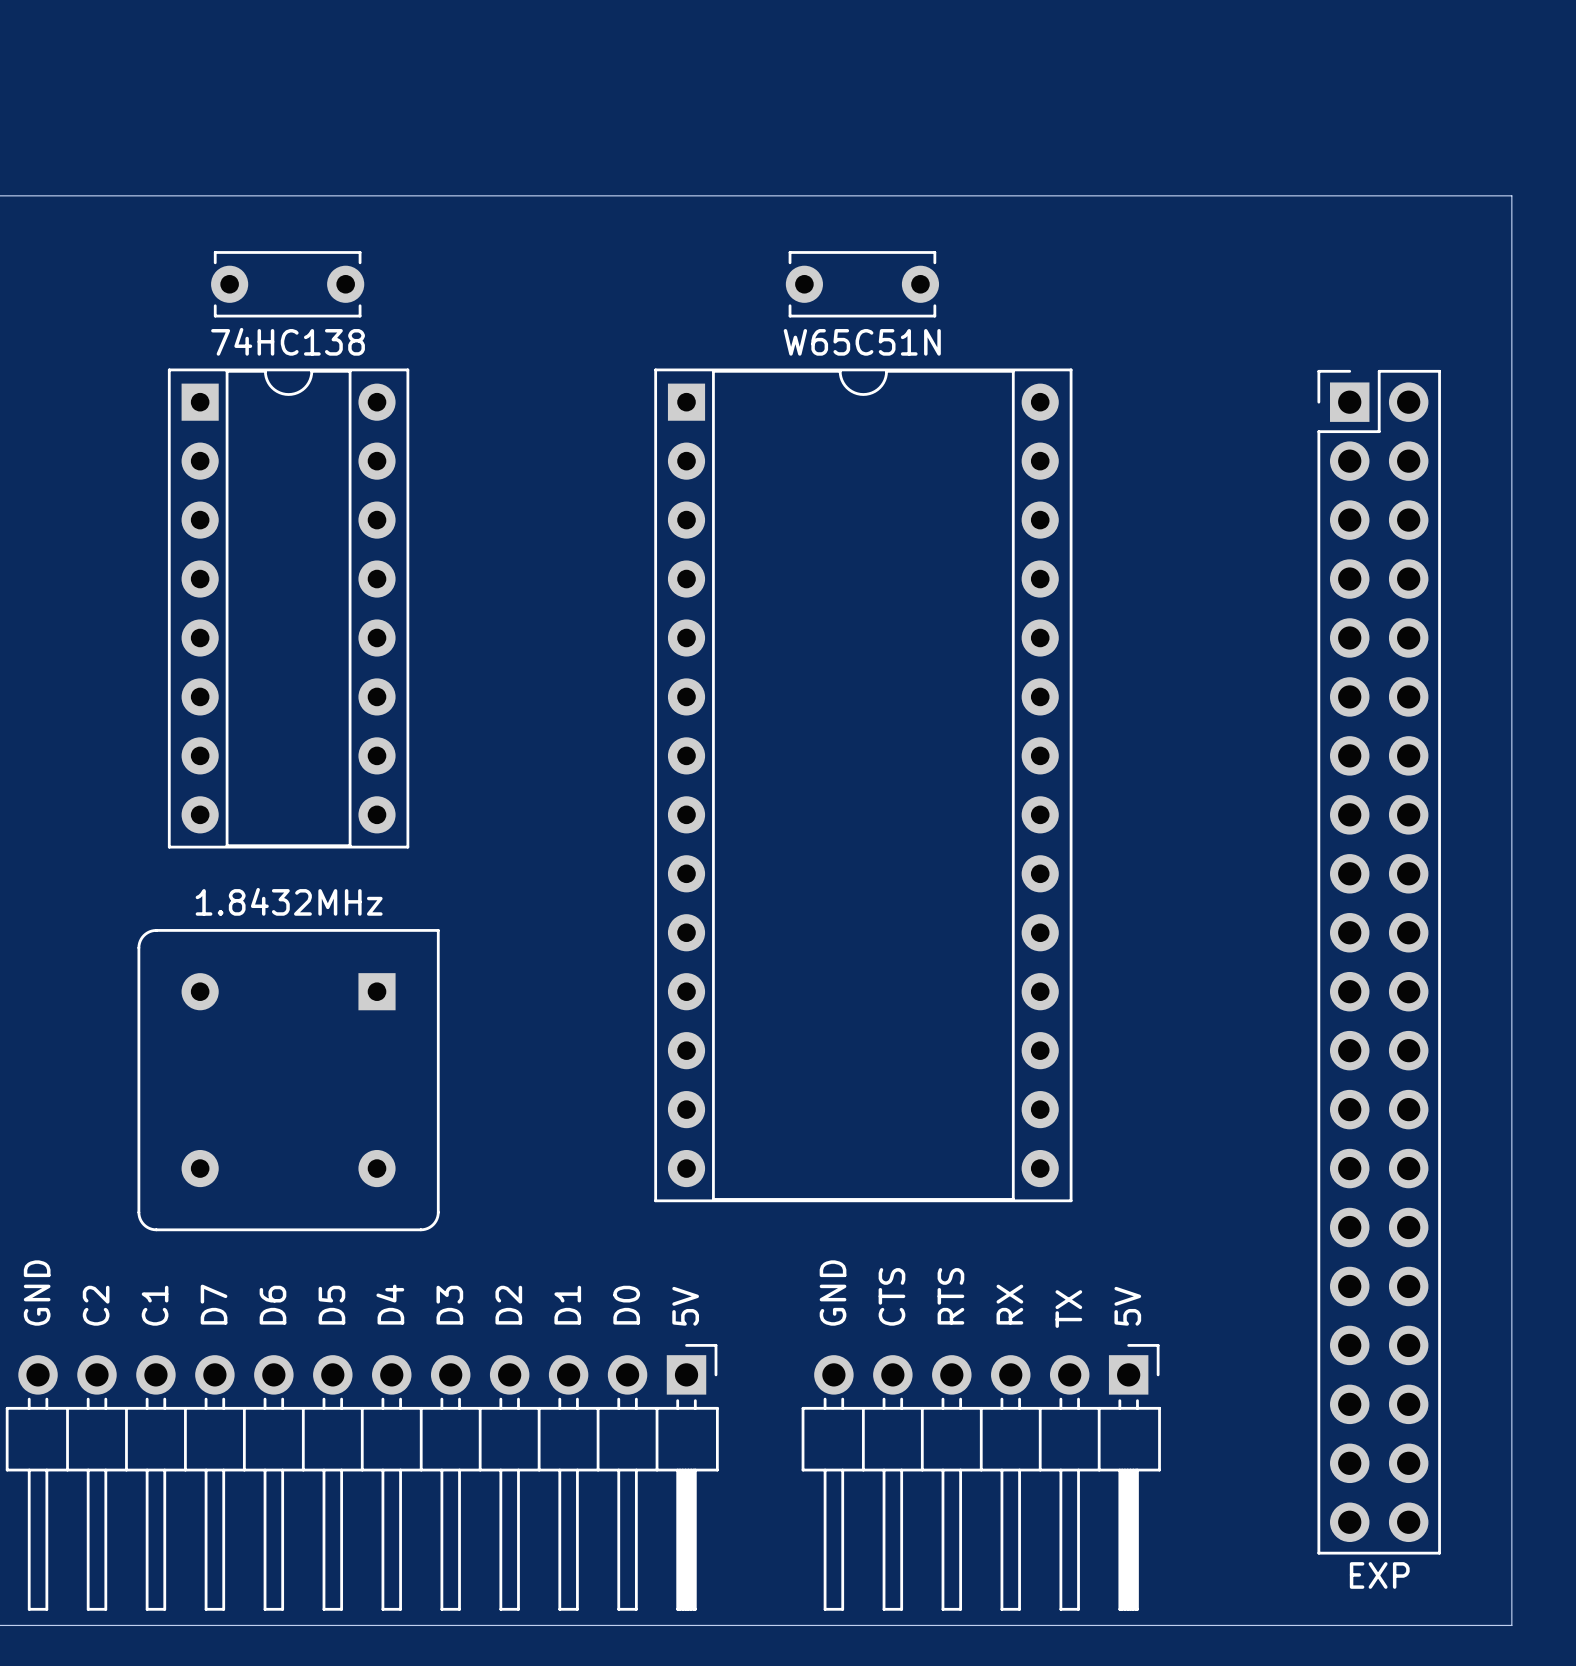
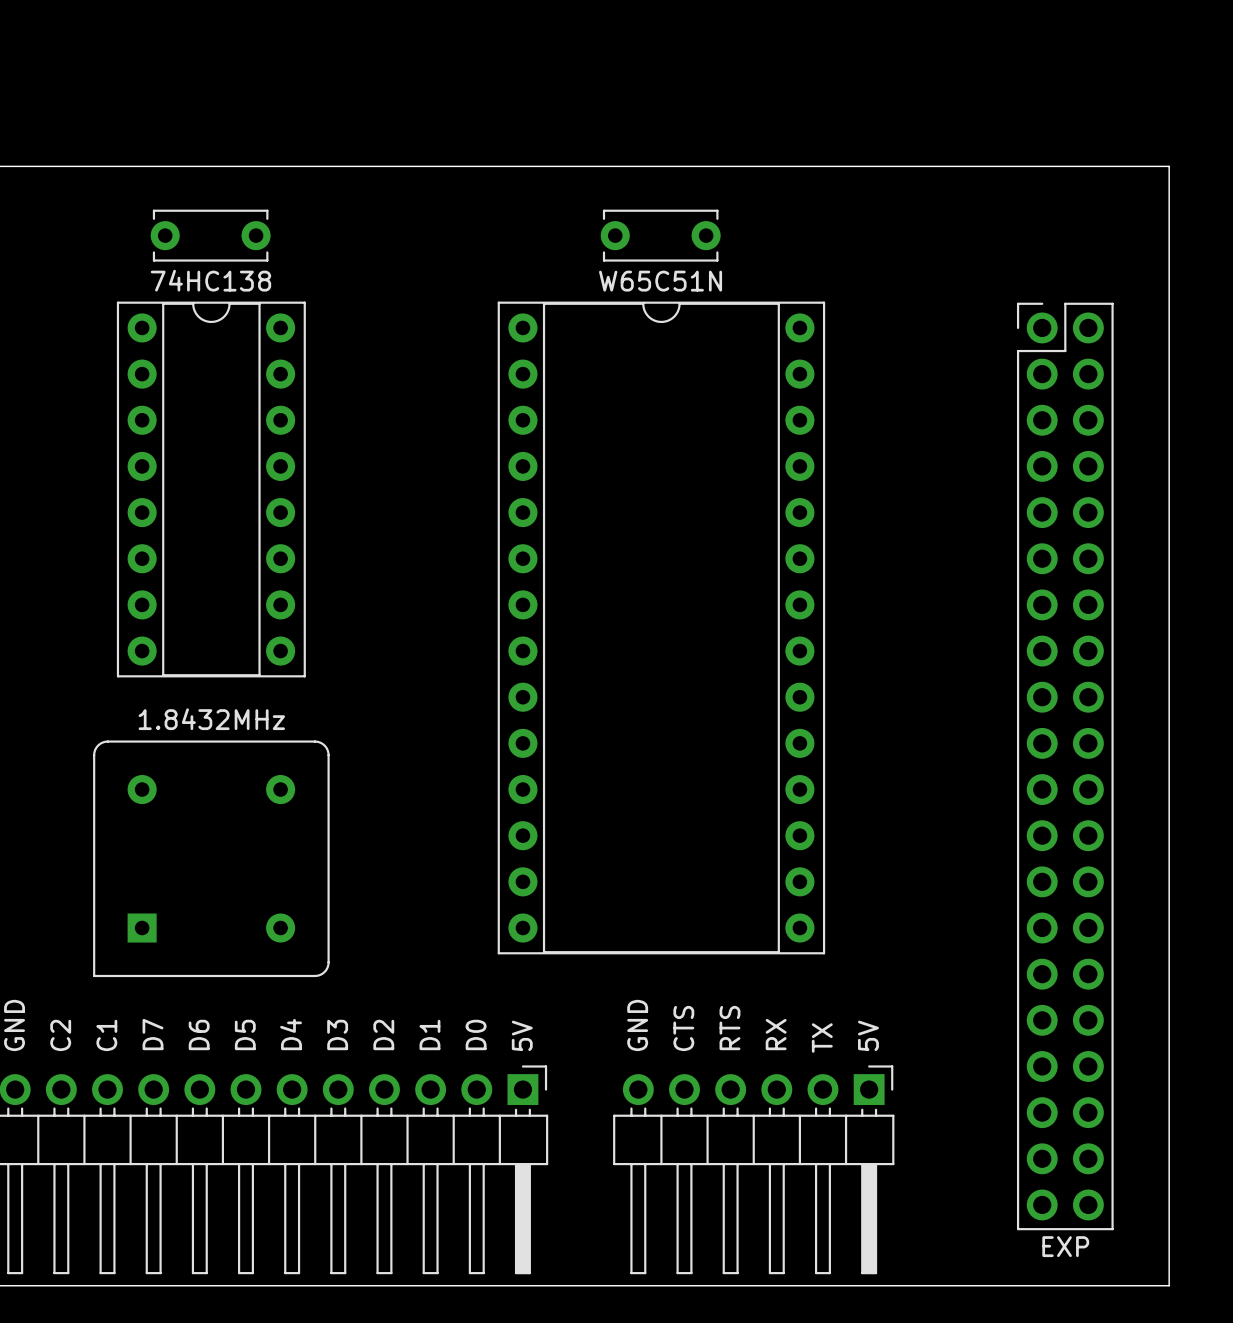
part footprint: [167, 368, 410, 849] -> [116, 301, 306, 678]
part footprint: [654, 368, 1073, 1203] -> [497, 301, 826, 955]
part footprint: [1317, 369, 1441, 1555] -> [1016, 302, 1114, 1231]
part rotation: 0° (288, 1080) -> 180° (211, 858)

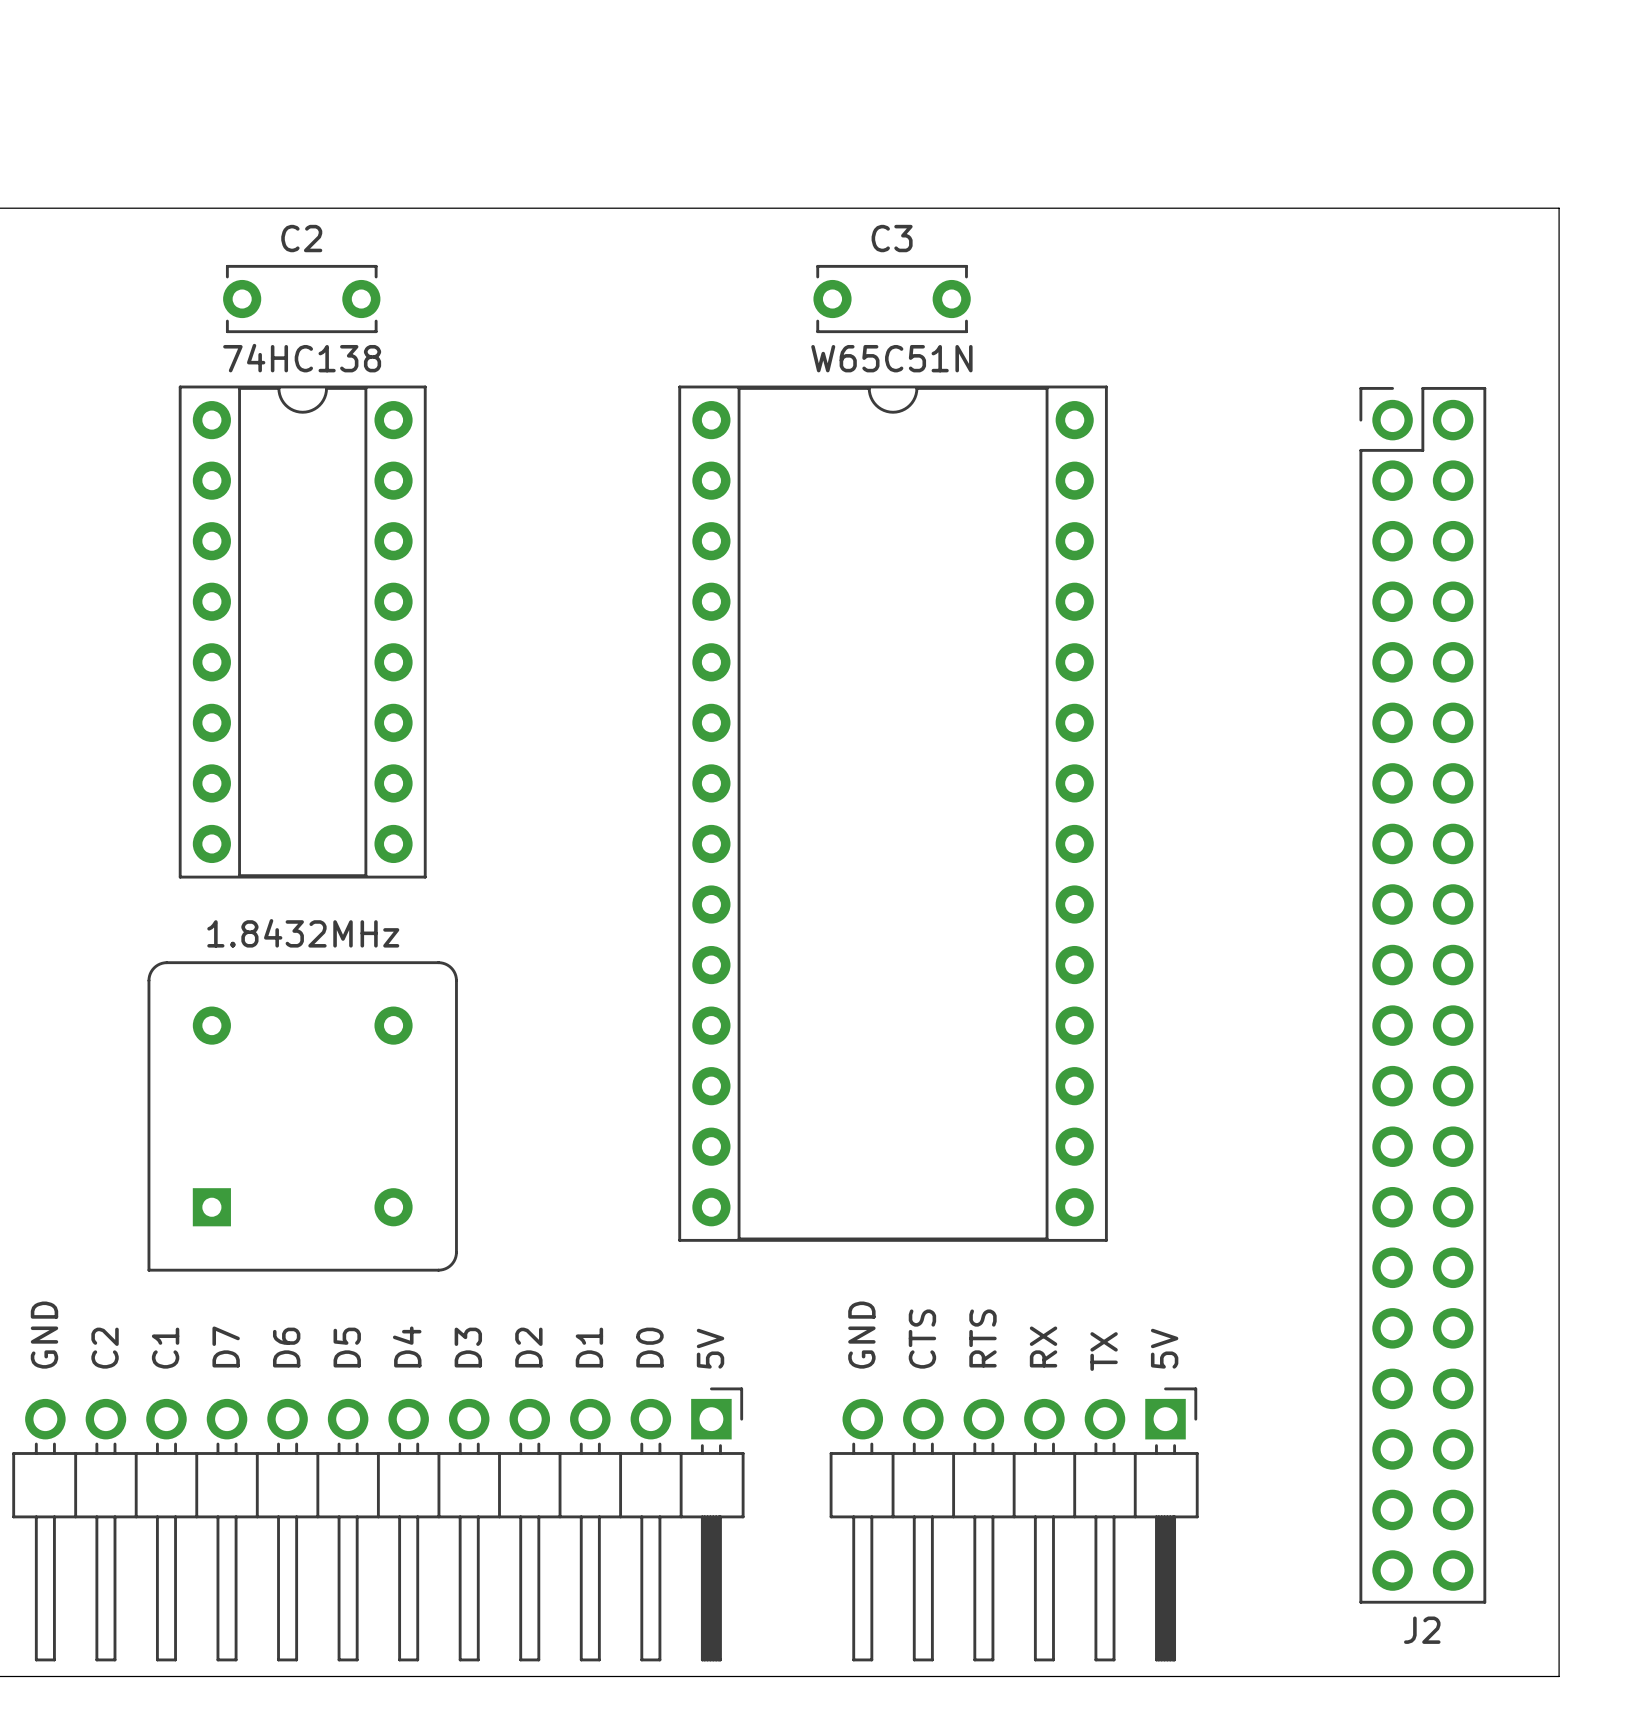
C2 name: none -> C2 (301, 238)
C3 name: none -> C3 (892, 238)
J2 value: EXP (1065, 1246) -> none
J2 name: none -> J2 (1422, 1630)

